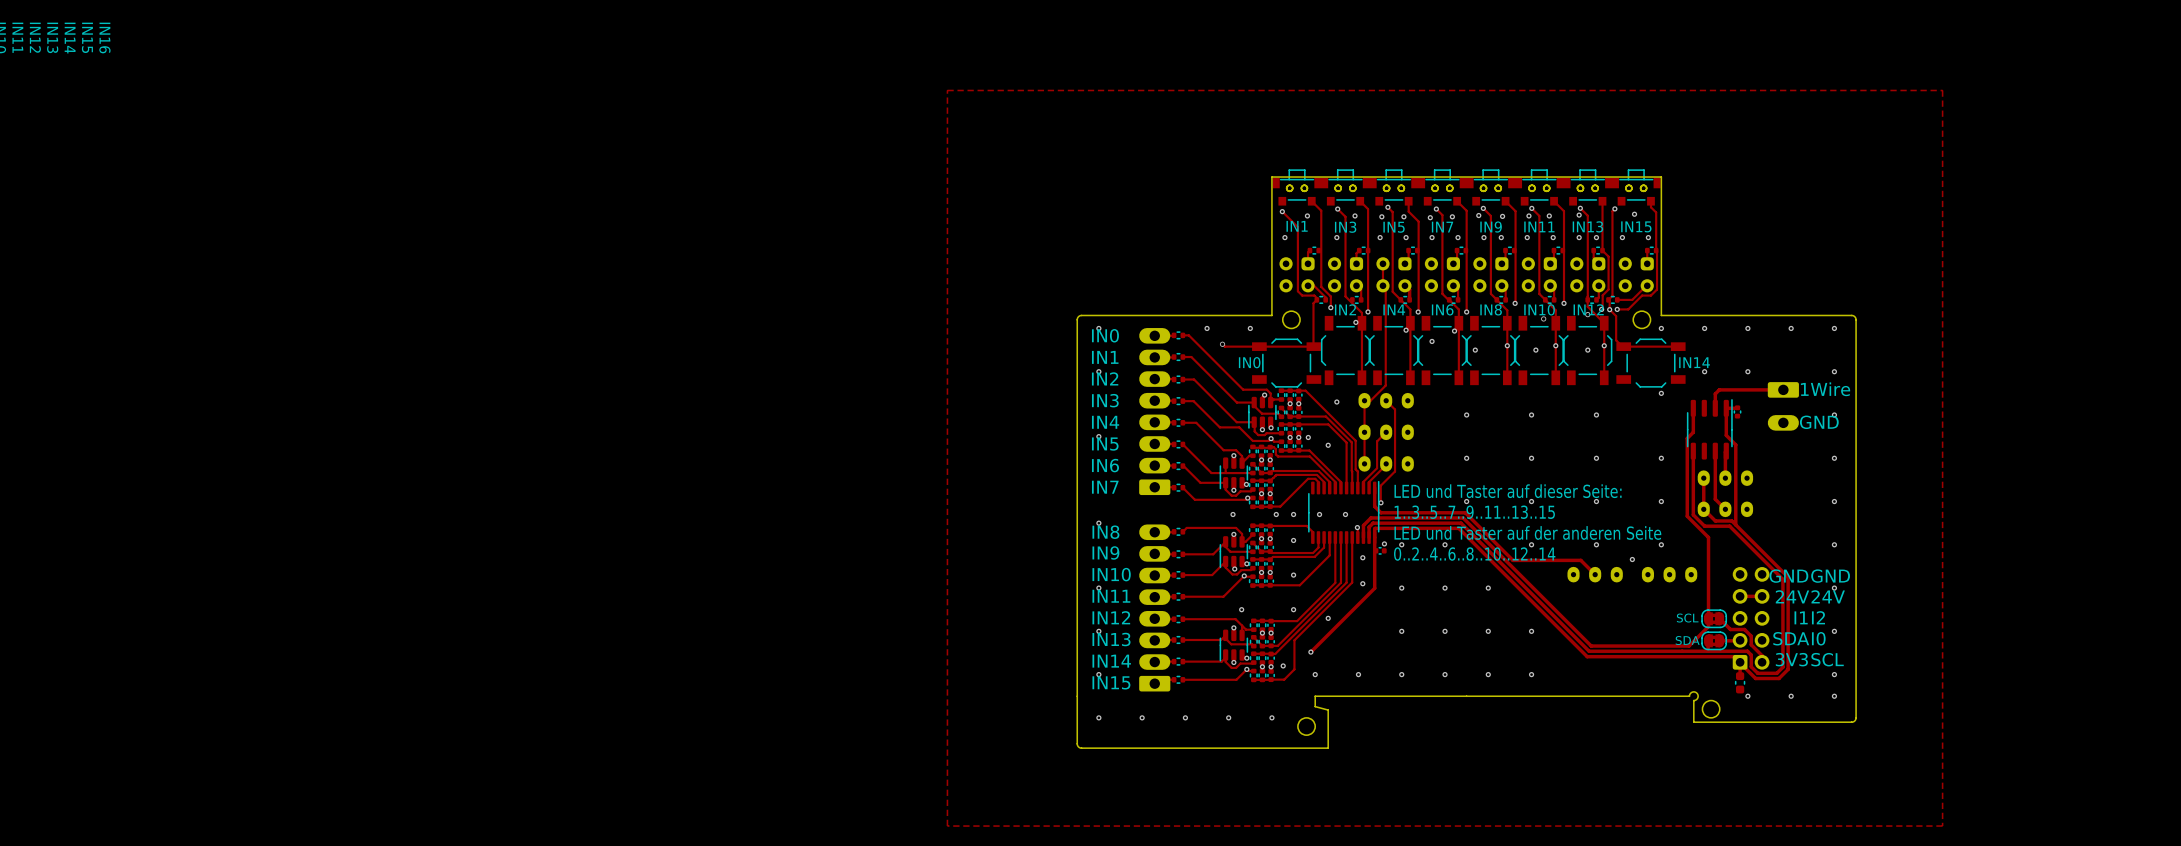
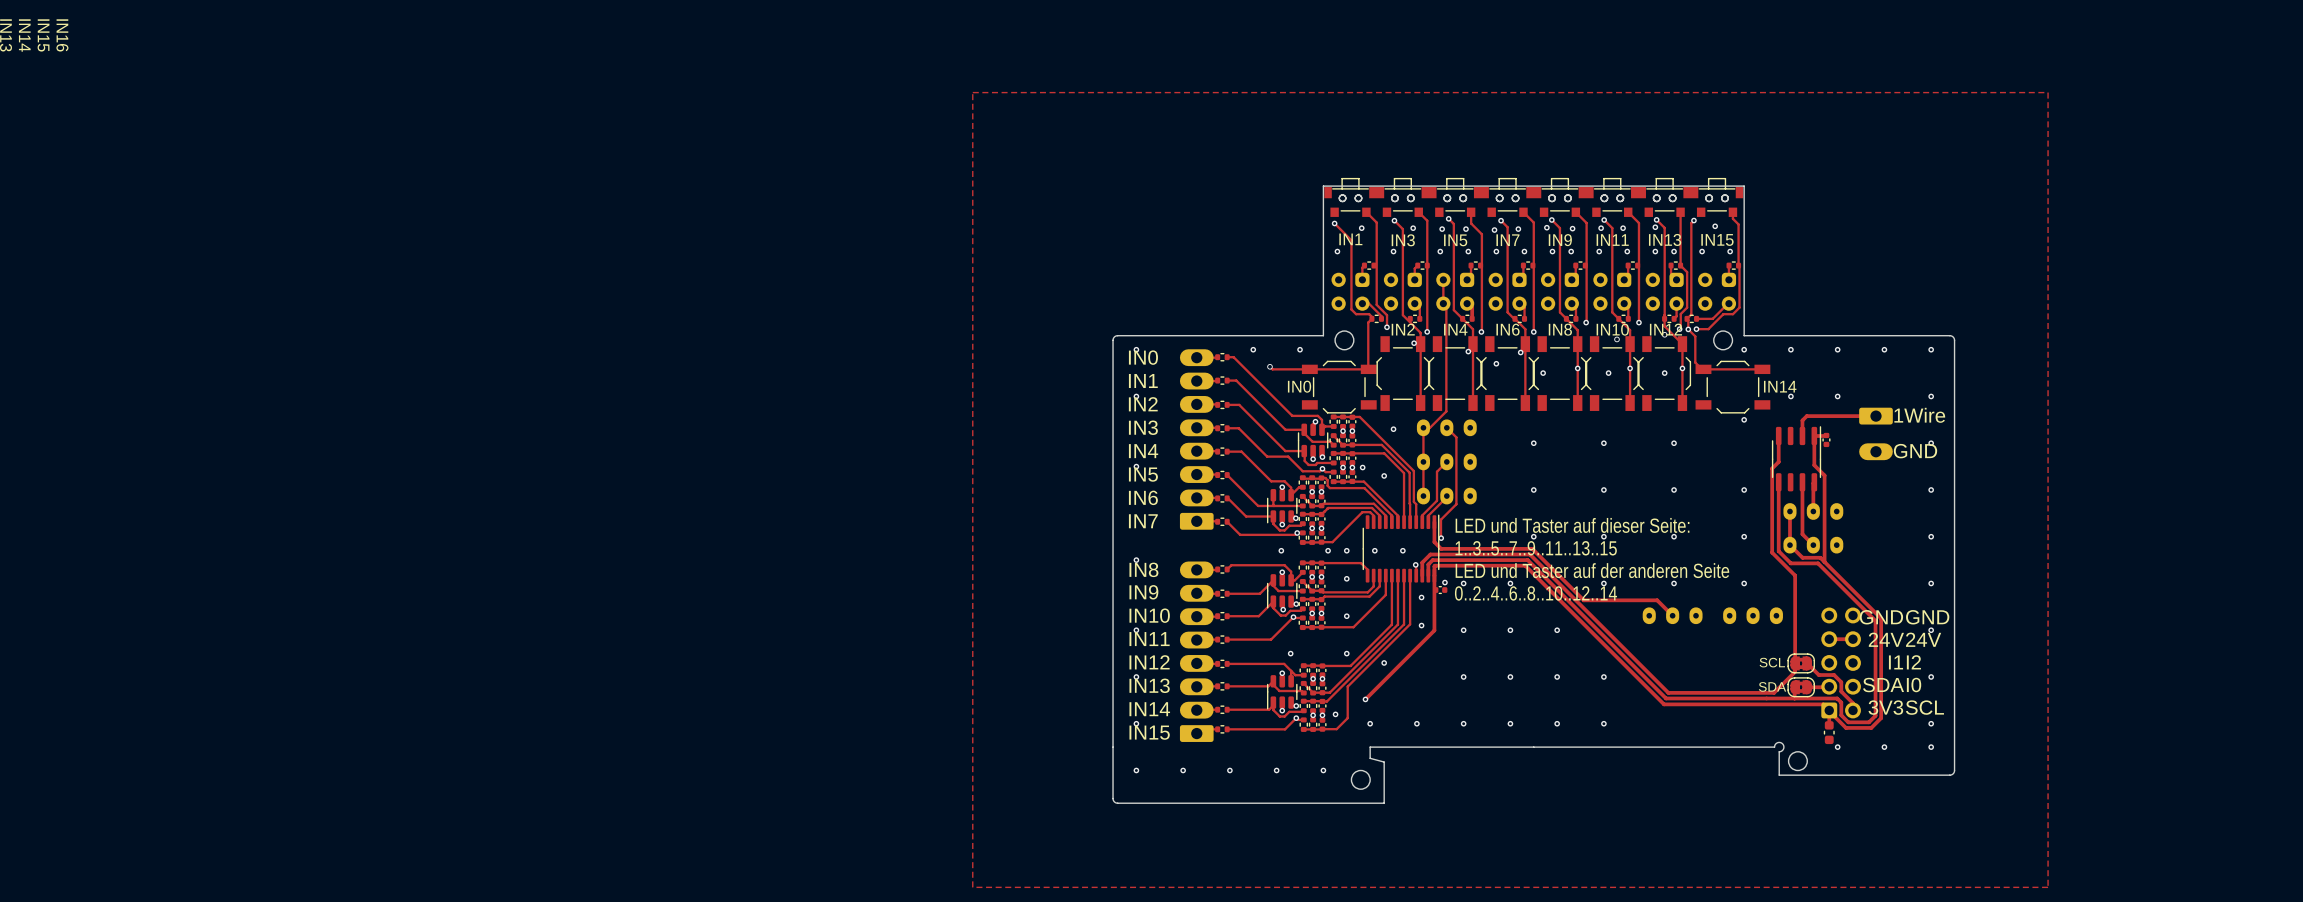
via: (1632, 559) -> none

